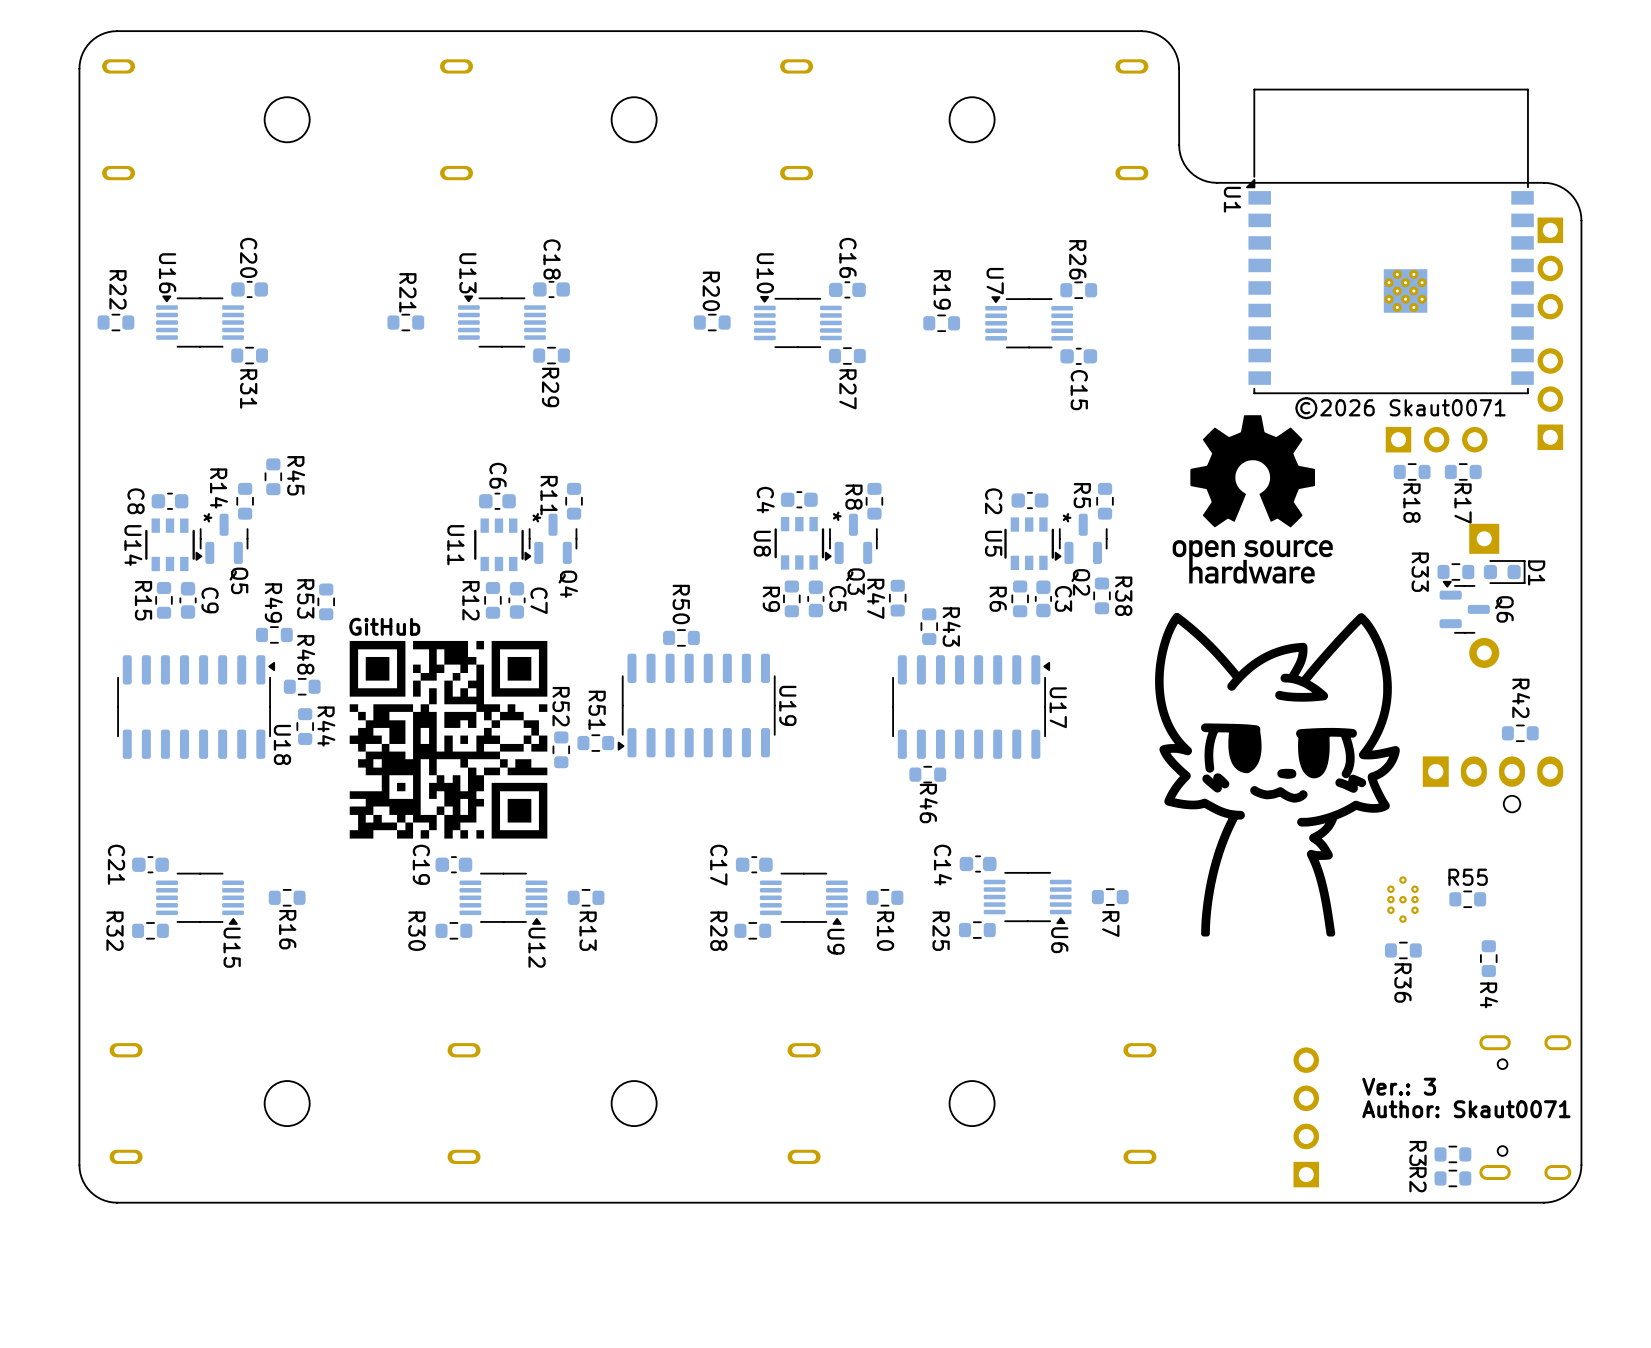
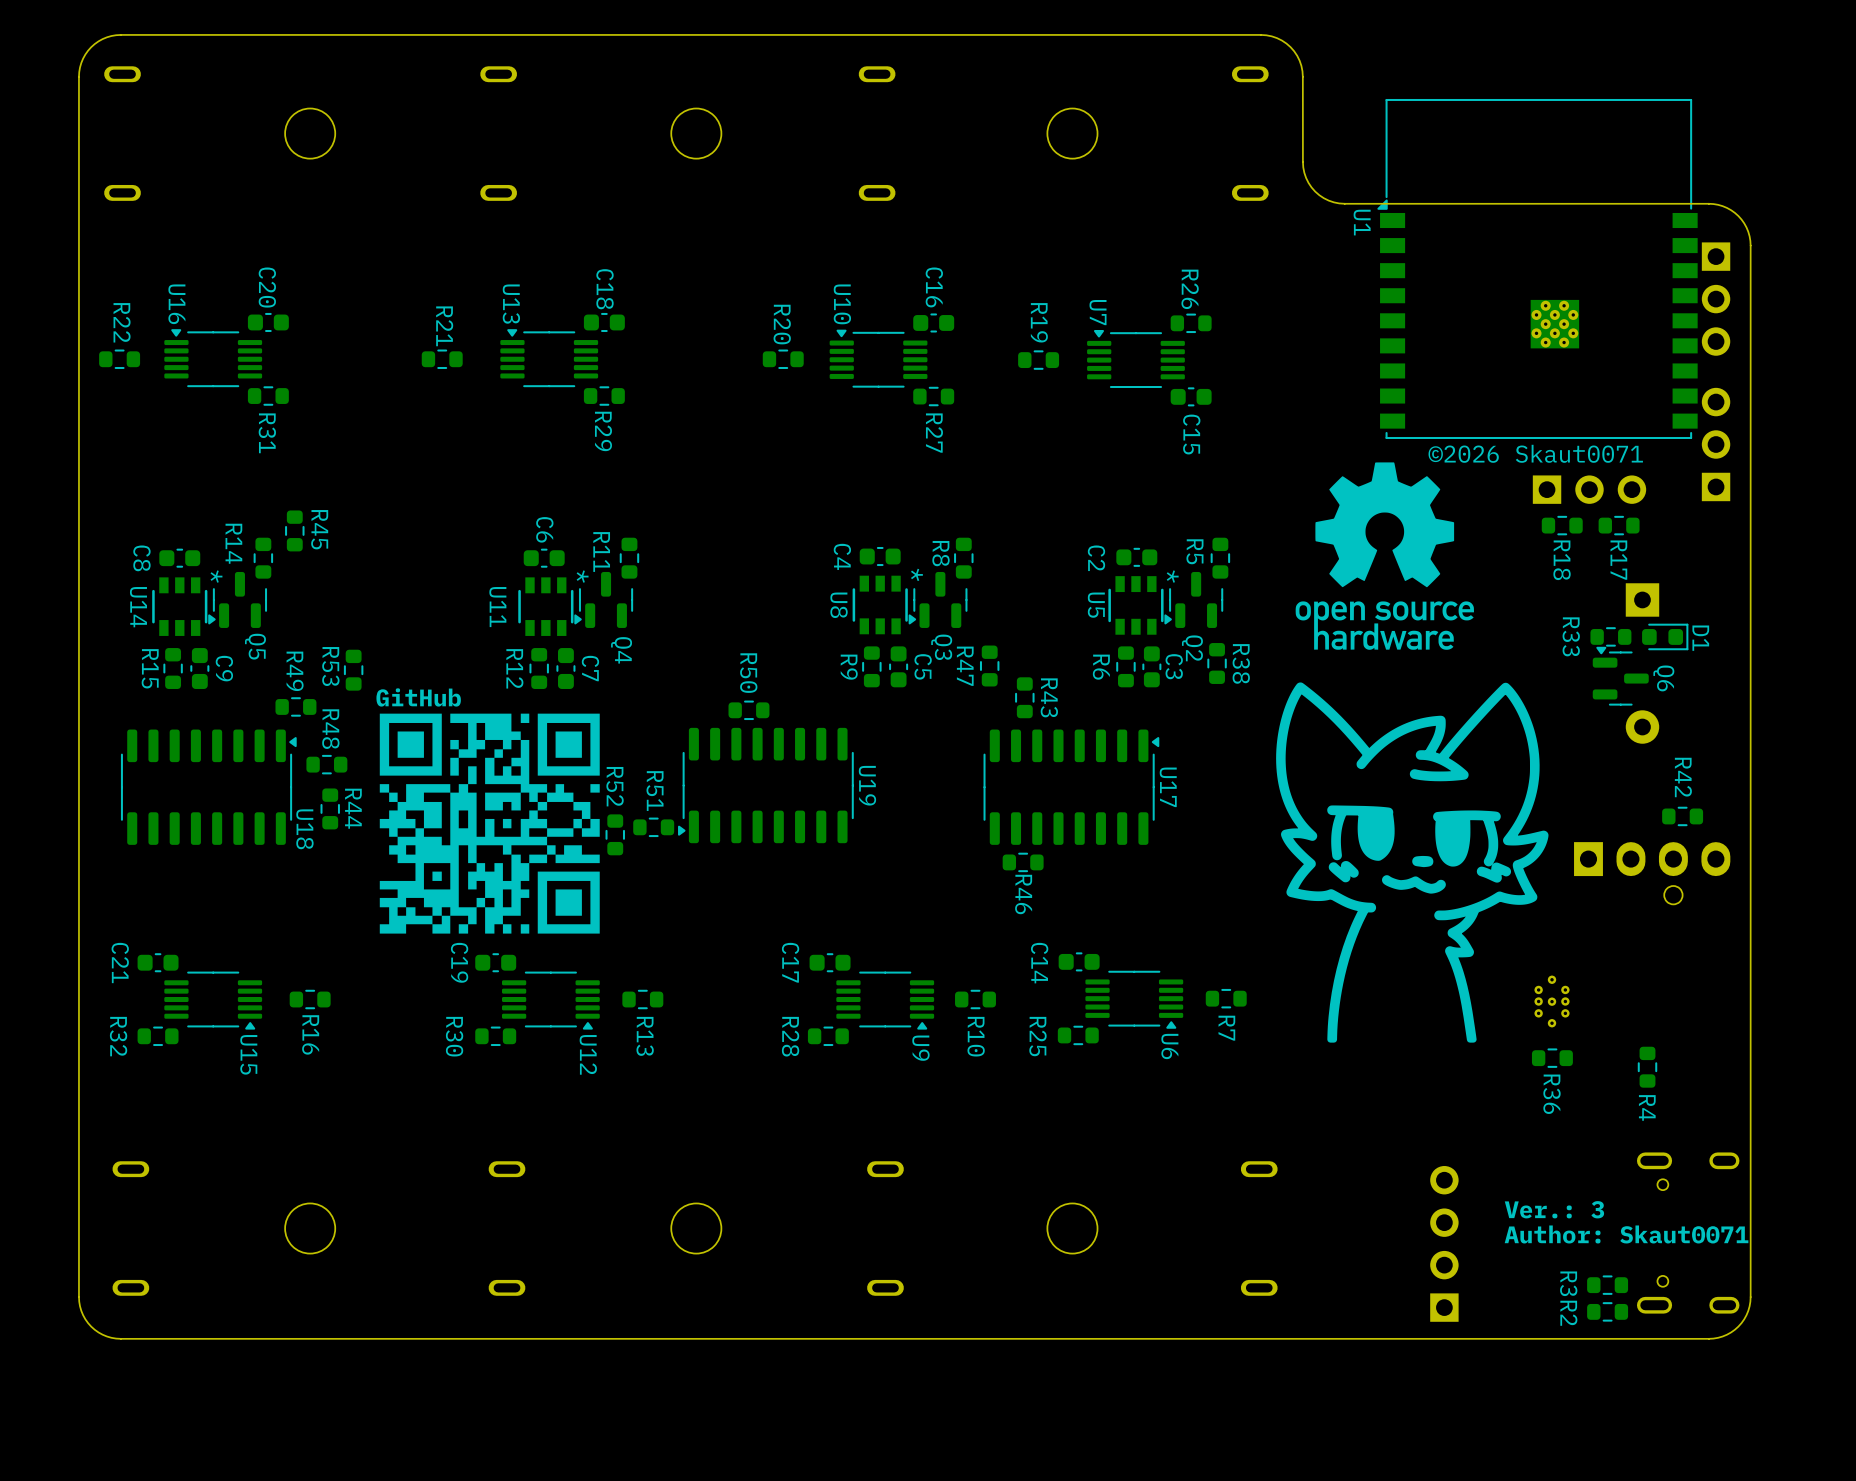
R55: (1467, 899) -> none

